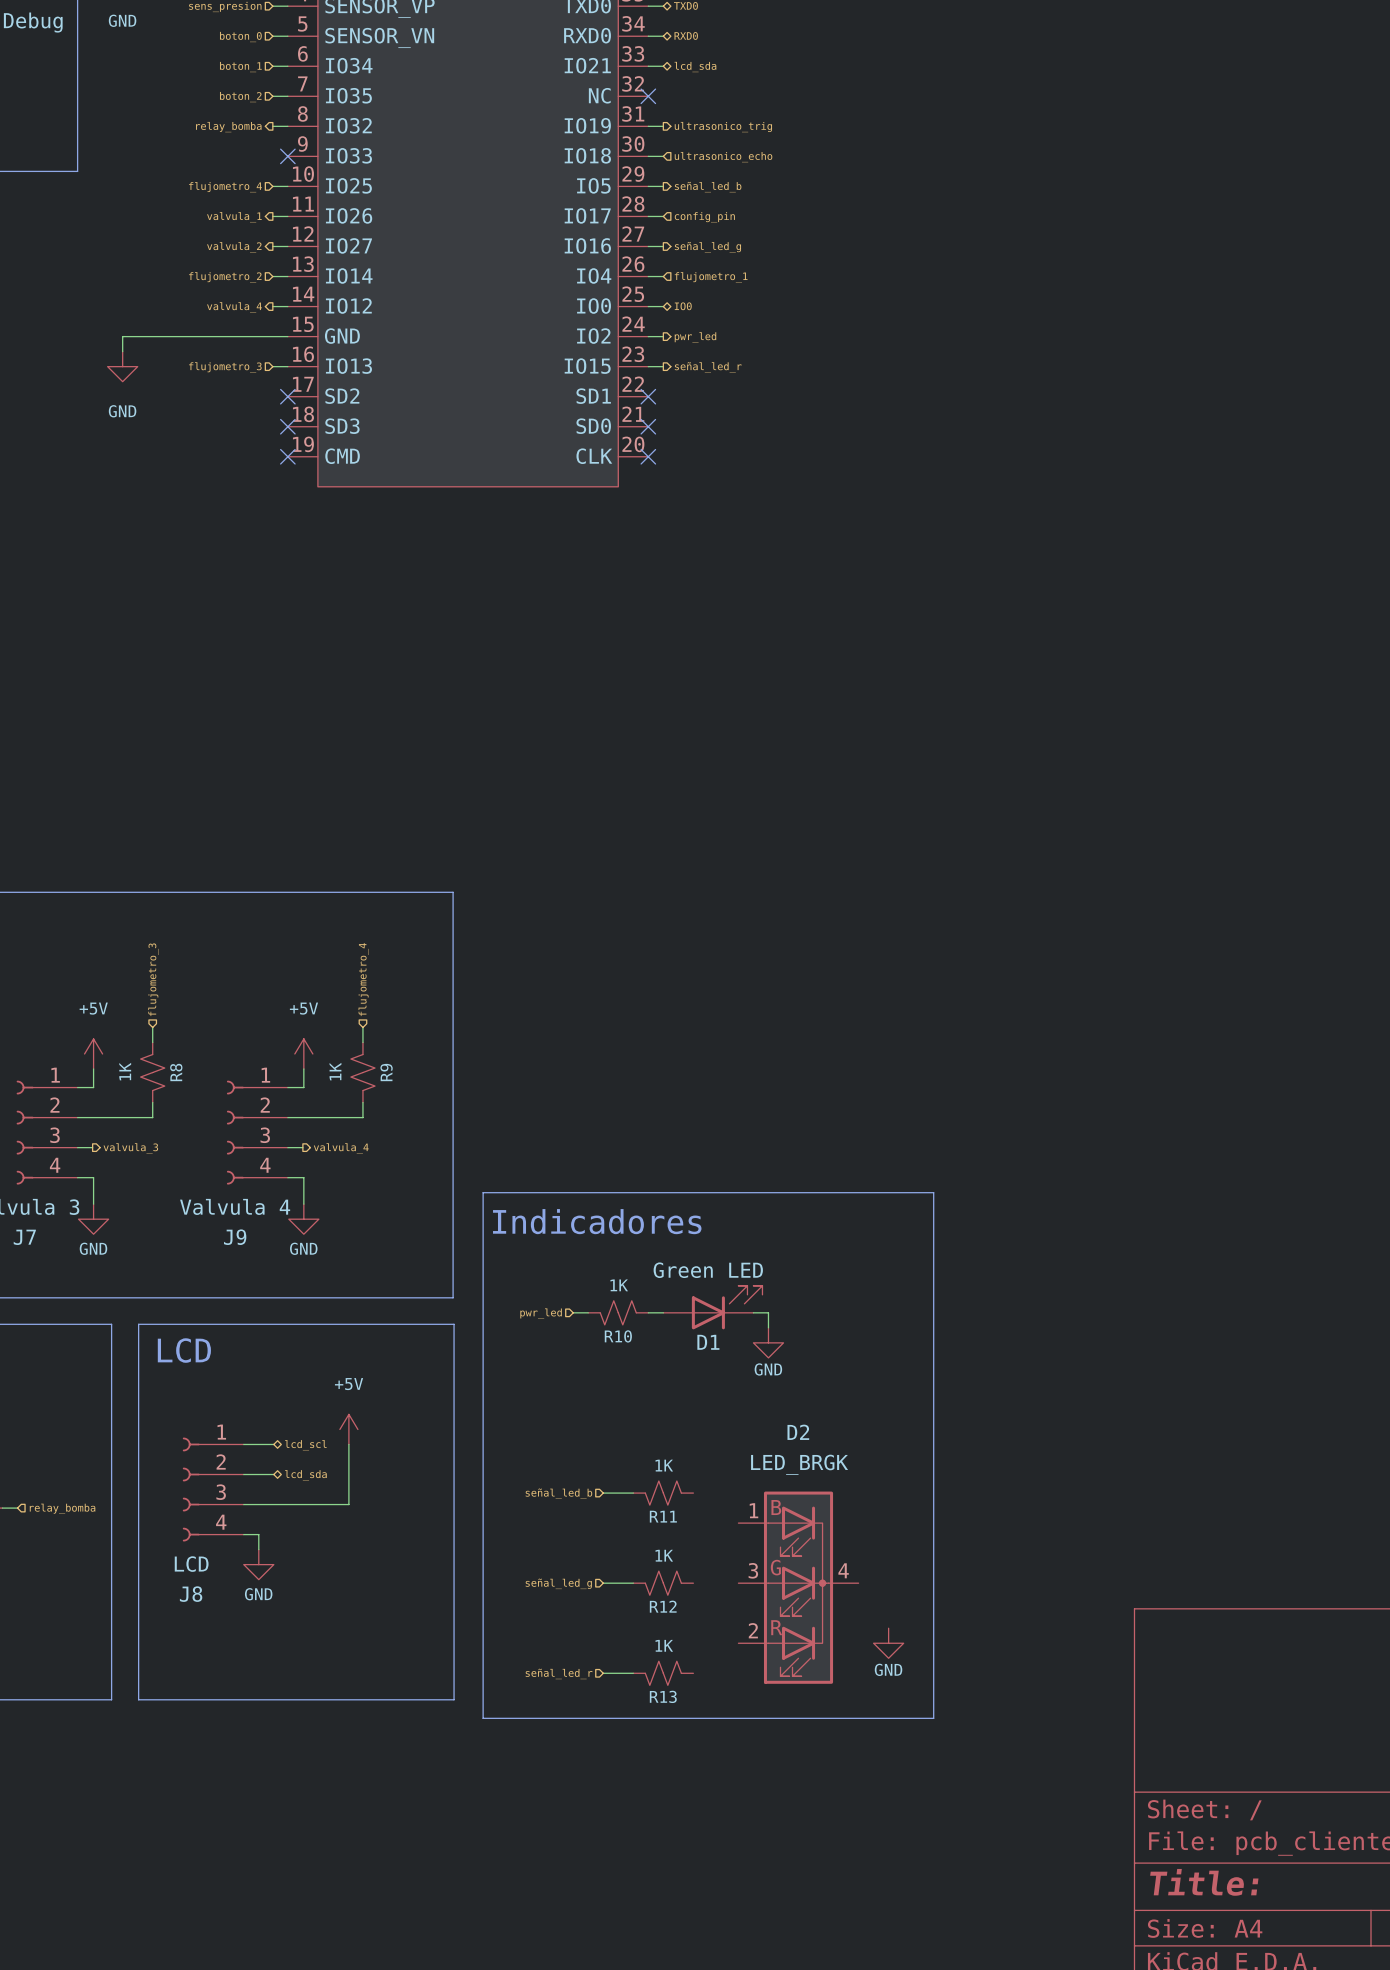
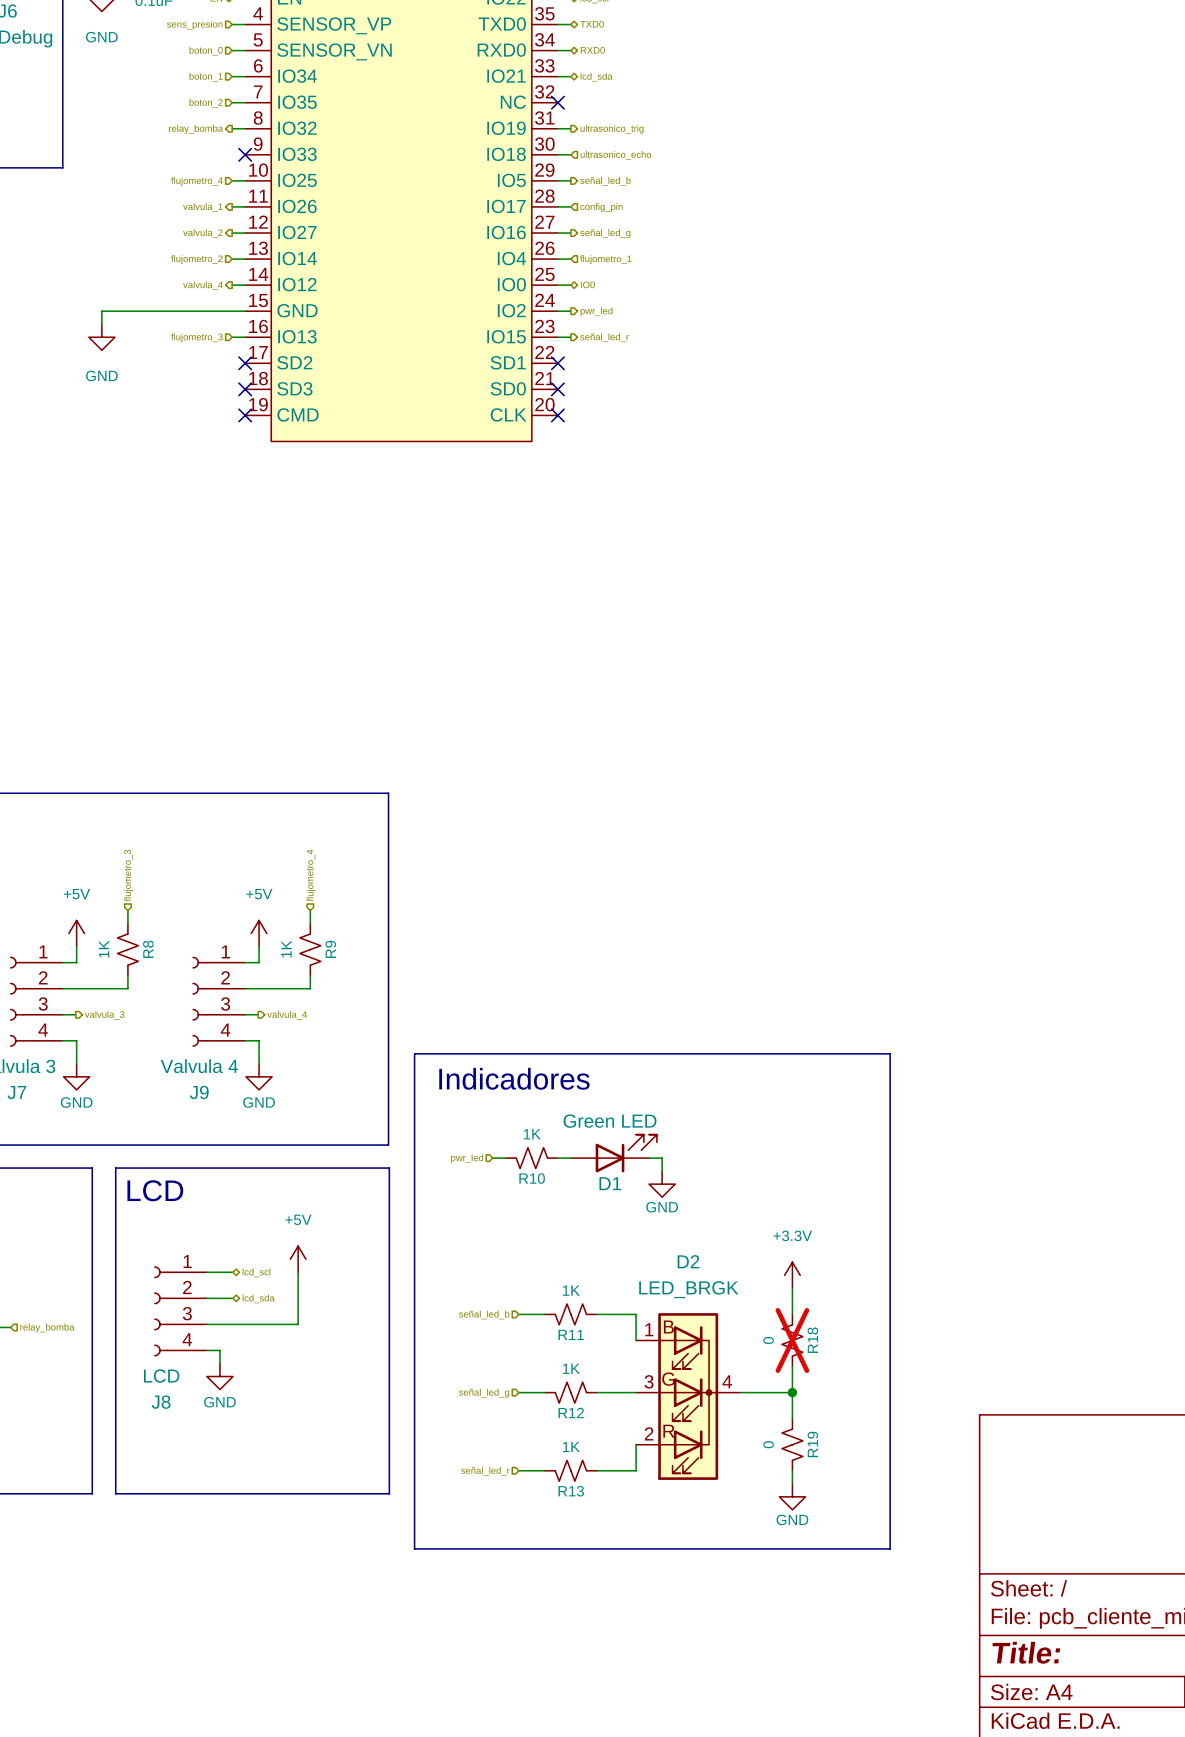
line: (933, 1192) (933, 1718) (483, 1718) -> (805, 1053) (890, 1053) (890, 1548) (414, 1548) (414, 1509)
power symbol: none -> +3.3V (792, 1275)
wire: none -> (792, 1288) (792, 1314)
wire: none -> (596, 1314) (636, 1314) (636, 1340)
R18: none -> 0 (792, 1340)
wire: none -> (792, 1366) (792, 1418)
wire: none -> (596, 1392) (636, 1392)
wire: none -> (740, 1392) (792, 1392)
junction: none -> (792, 1392)
wire: none -> (636, 1444) (636, 1470) (596, 1470)
power symbol position: GND (888, 1643) -> GND (792, 1496)
R19: none -> 0 (792, 1444)
wire: none -> (792, 1470) (792, 1483)

